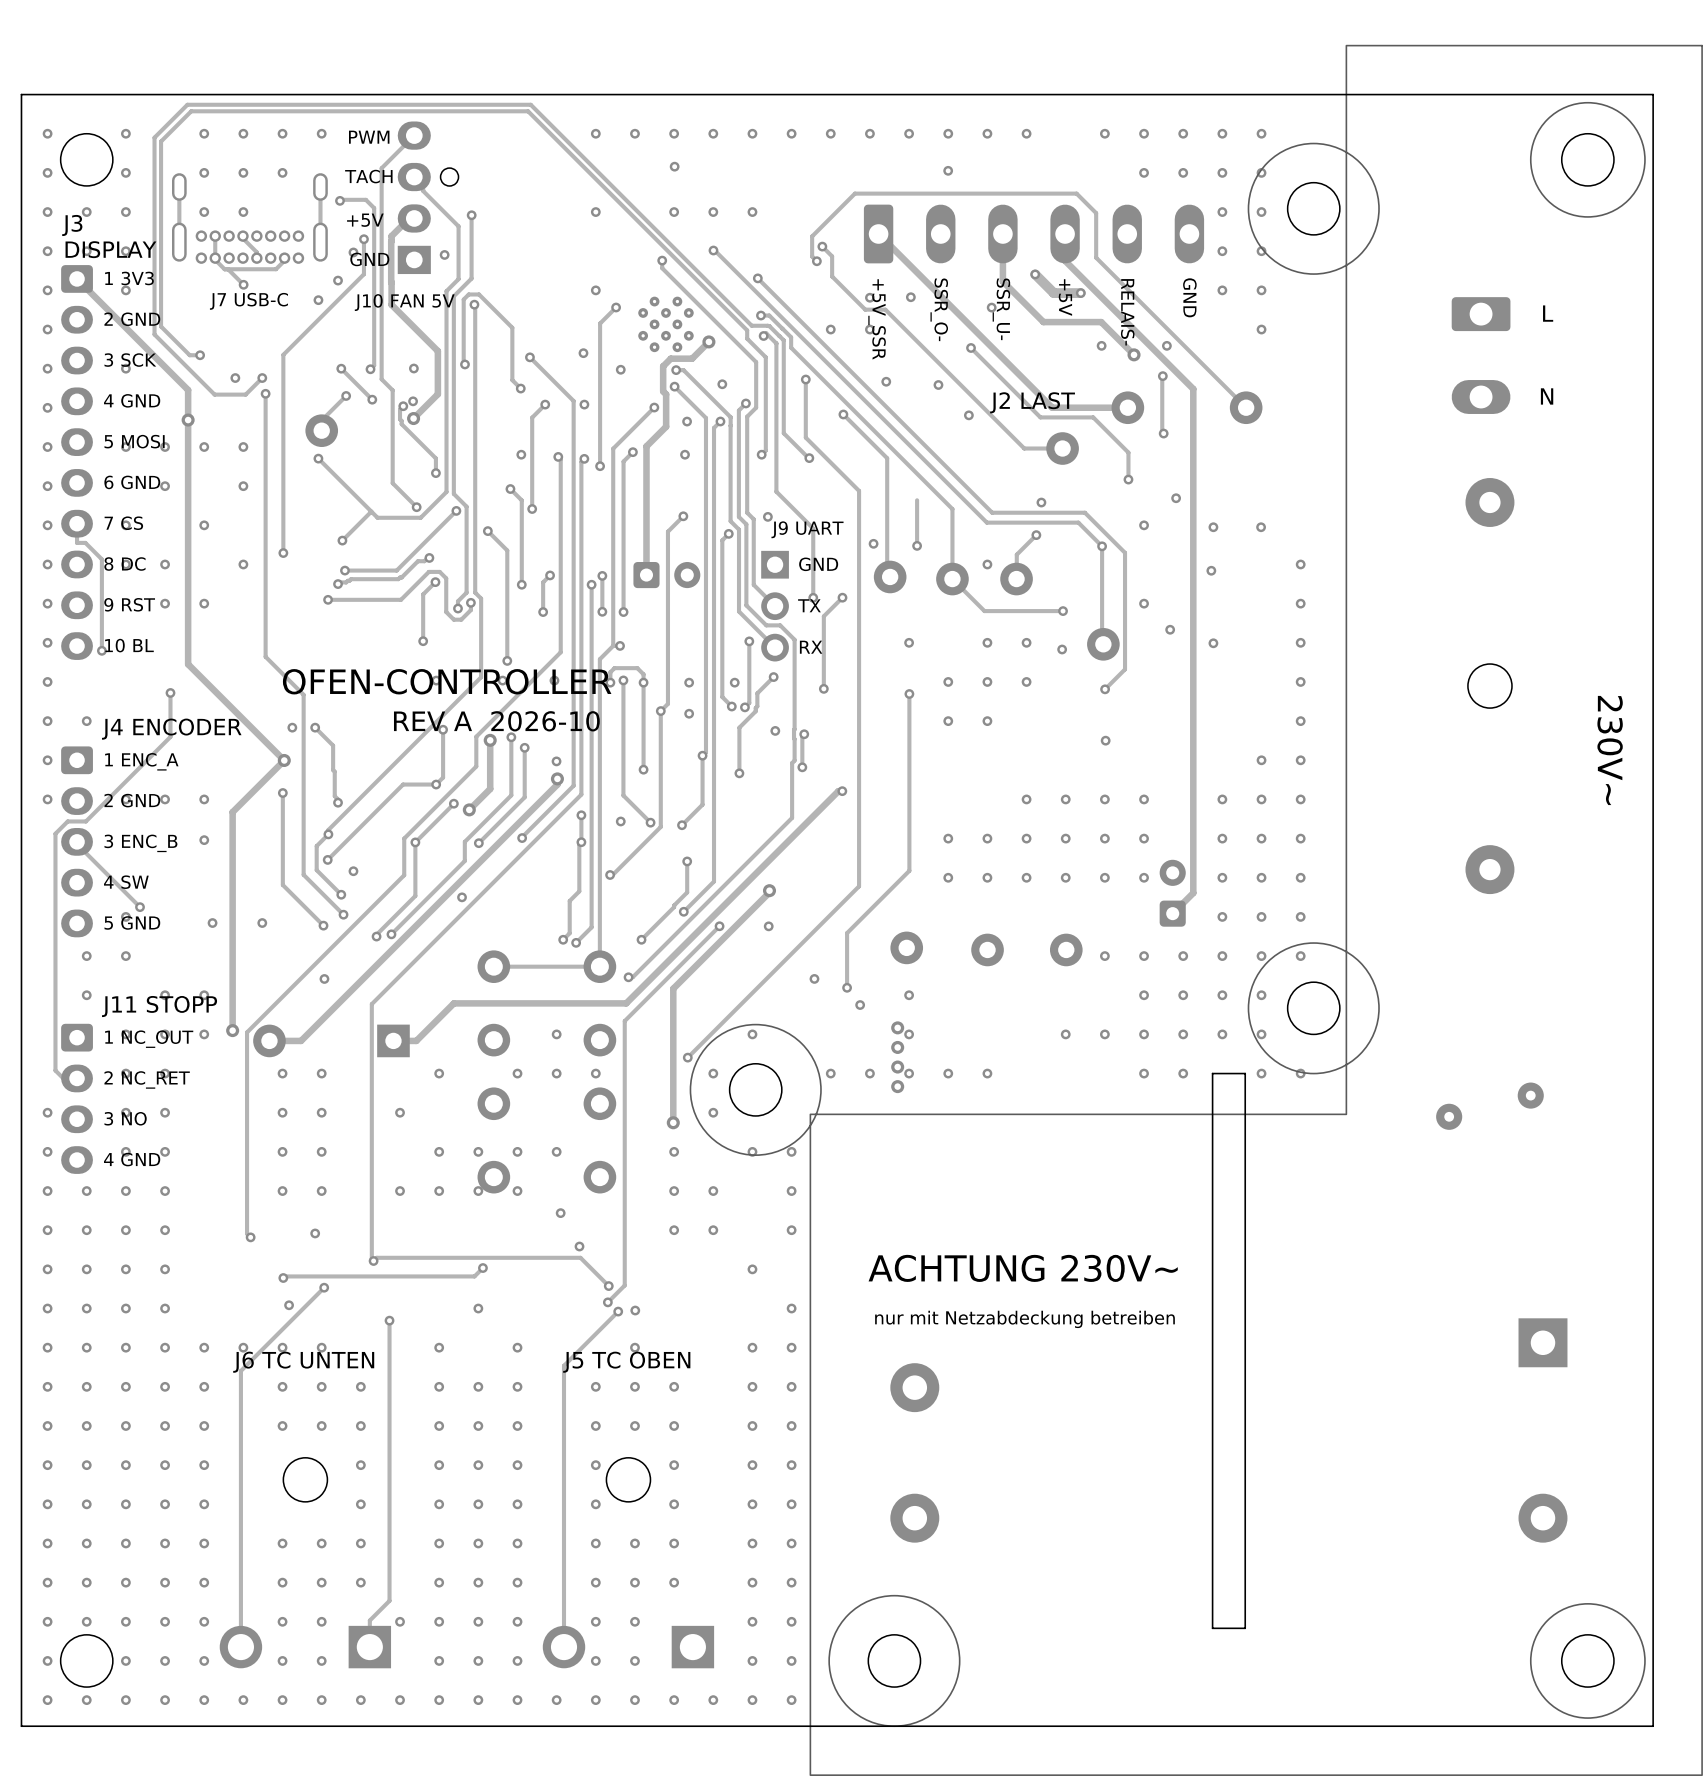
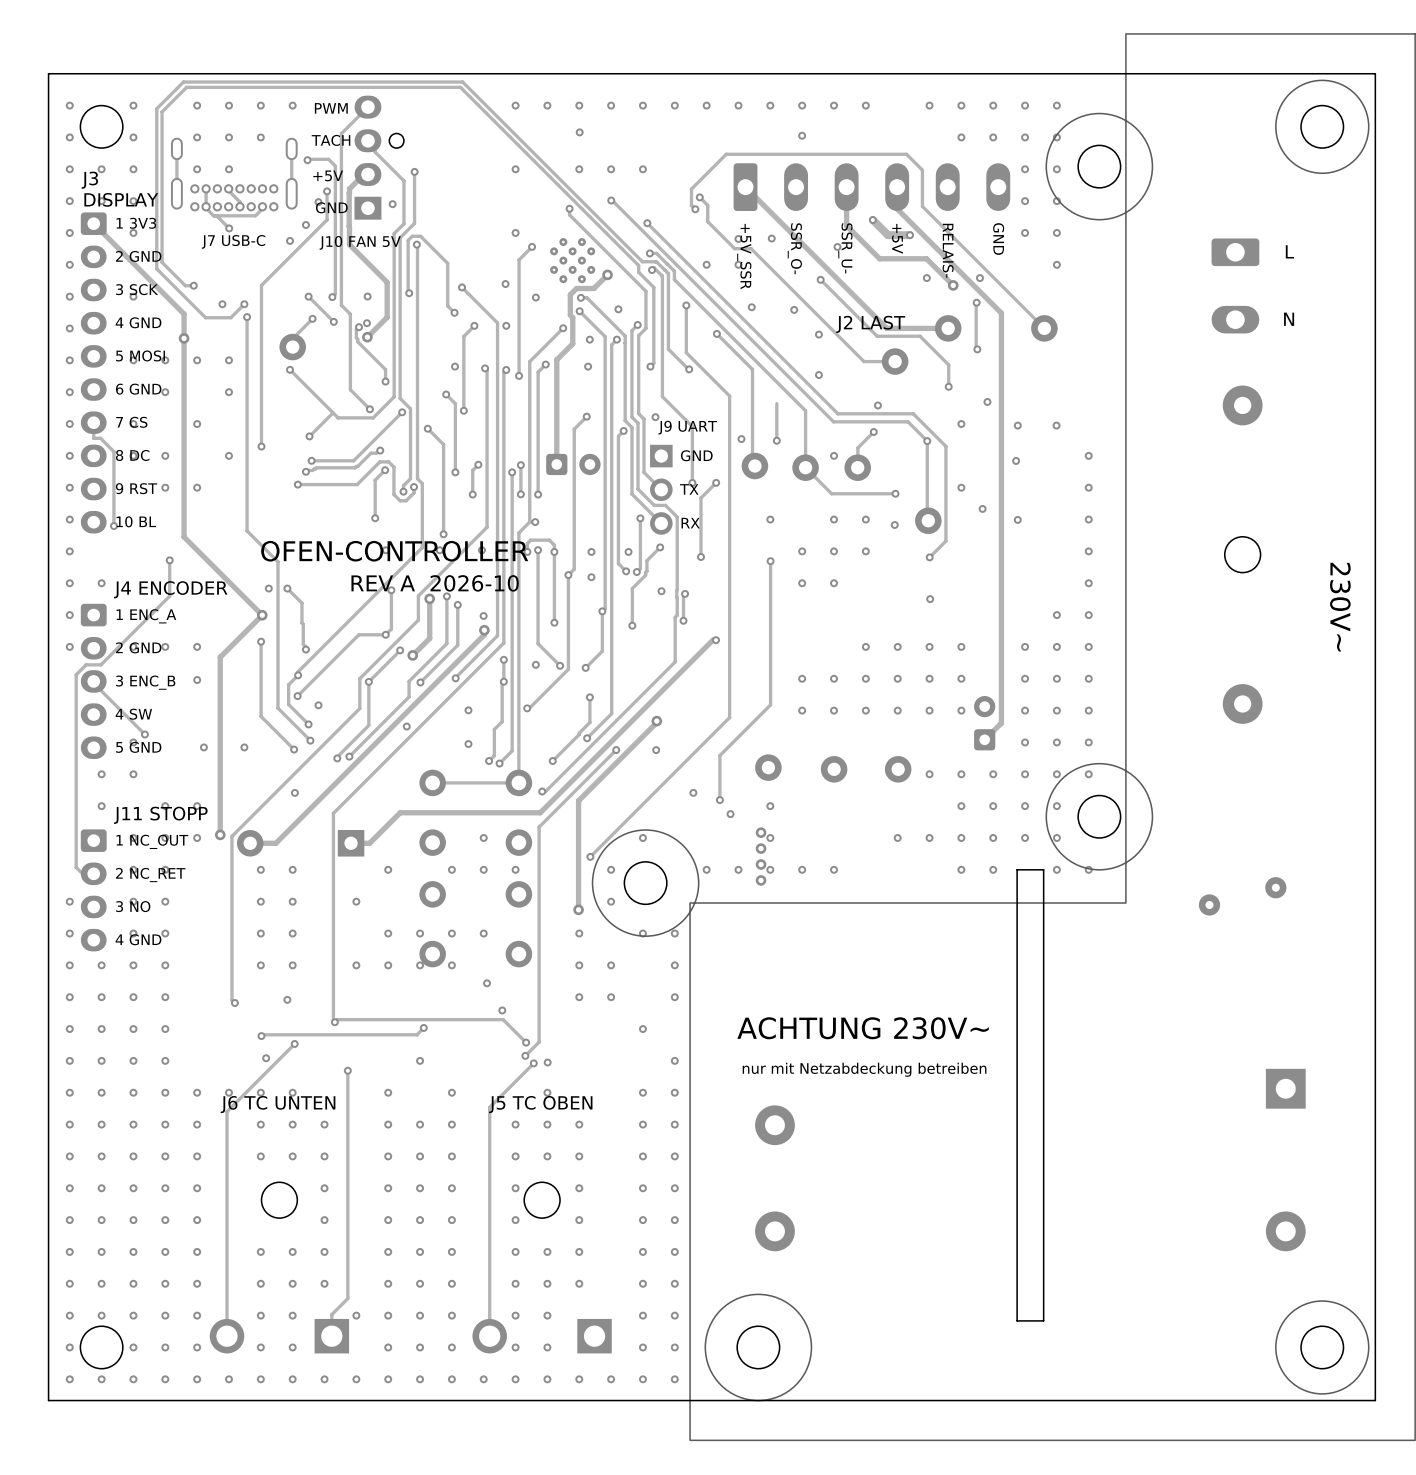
via: none -> (818, 375)
via: none -> (468, 710)
via: none -> (468, 744)

